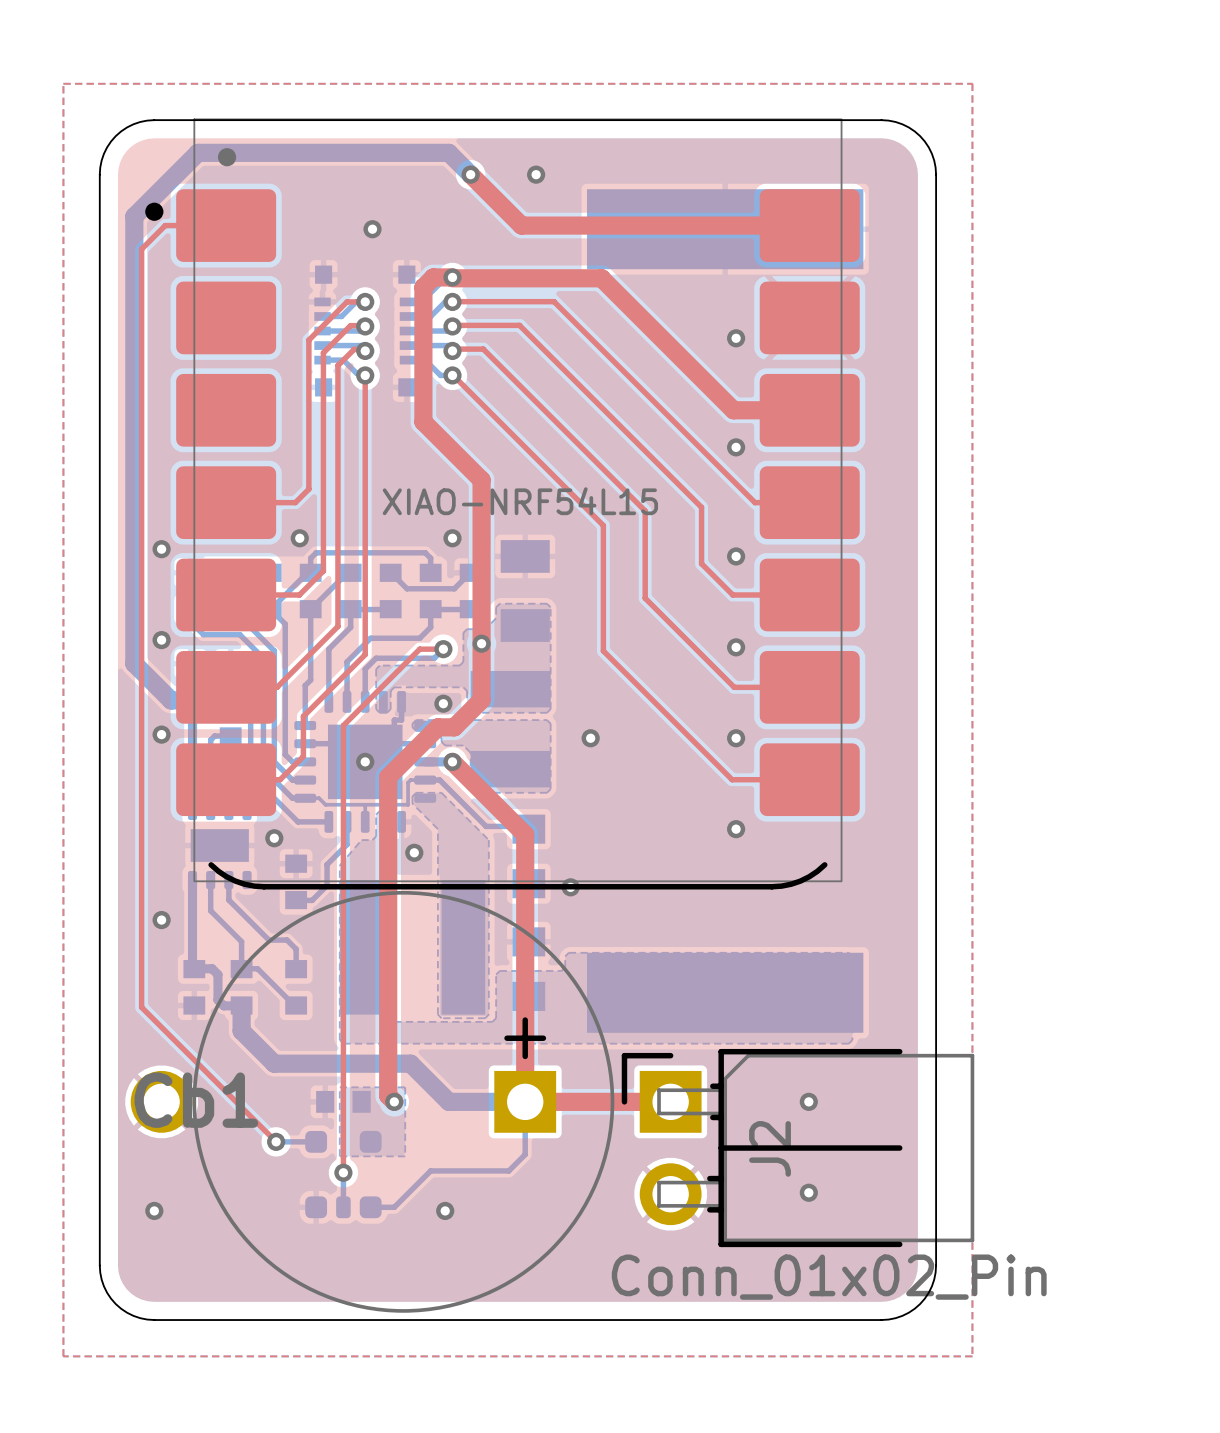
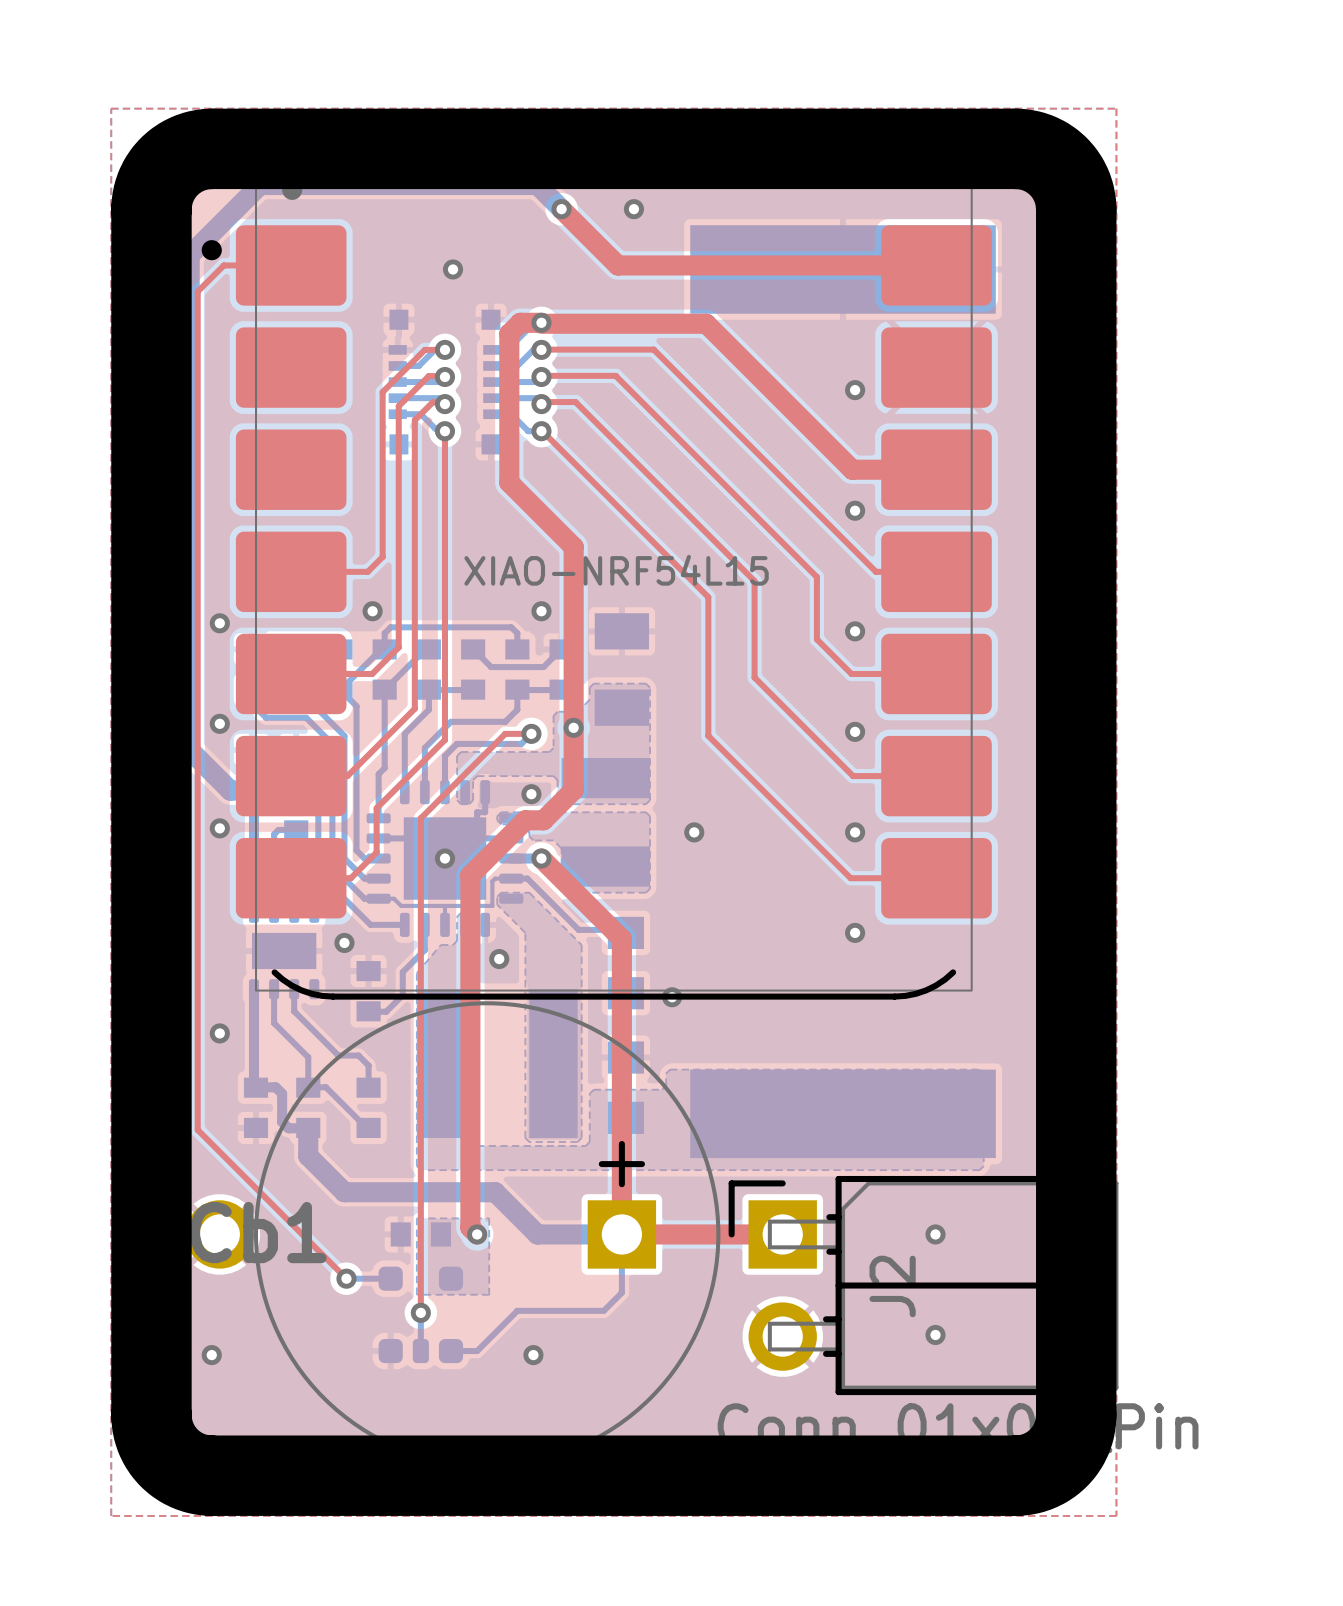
board edge width: thin (154, 120) (881, 120) (895, 121) (908, 127) (920, 136) (928, 147) (934, 160) (936, 174) (936, 1265) (934, 1279) (928, 1292) (920, 1304) (908, 1312) (895, 1318) (881, 1320) (154, 1320) (140, 1318) (127, 1312) (115, 1304) (107, 1292) (101, 1279) (99, 1265) (99, 174) (103, 153) (115, 136) (133, 124) (154, 120) -> thick (211, 148) (1015, 148) (1031, 150) (1046, 156) (1058, 166) (1068, 179) (1074, 193) (1076, 209) (1076, 1415) (1074, 1431) (1068, 1445) (1058, 1458) (1046, 1467) (1031, 1473) (1015, 1475) (211, 1475) (196, 1473) (181, 1467) (169, 1458) (159, 1445) (153, 1431) (151, 1415) (151, 209) (156, 186) (169, 166) (188, 153) (211, 148)

